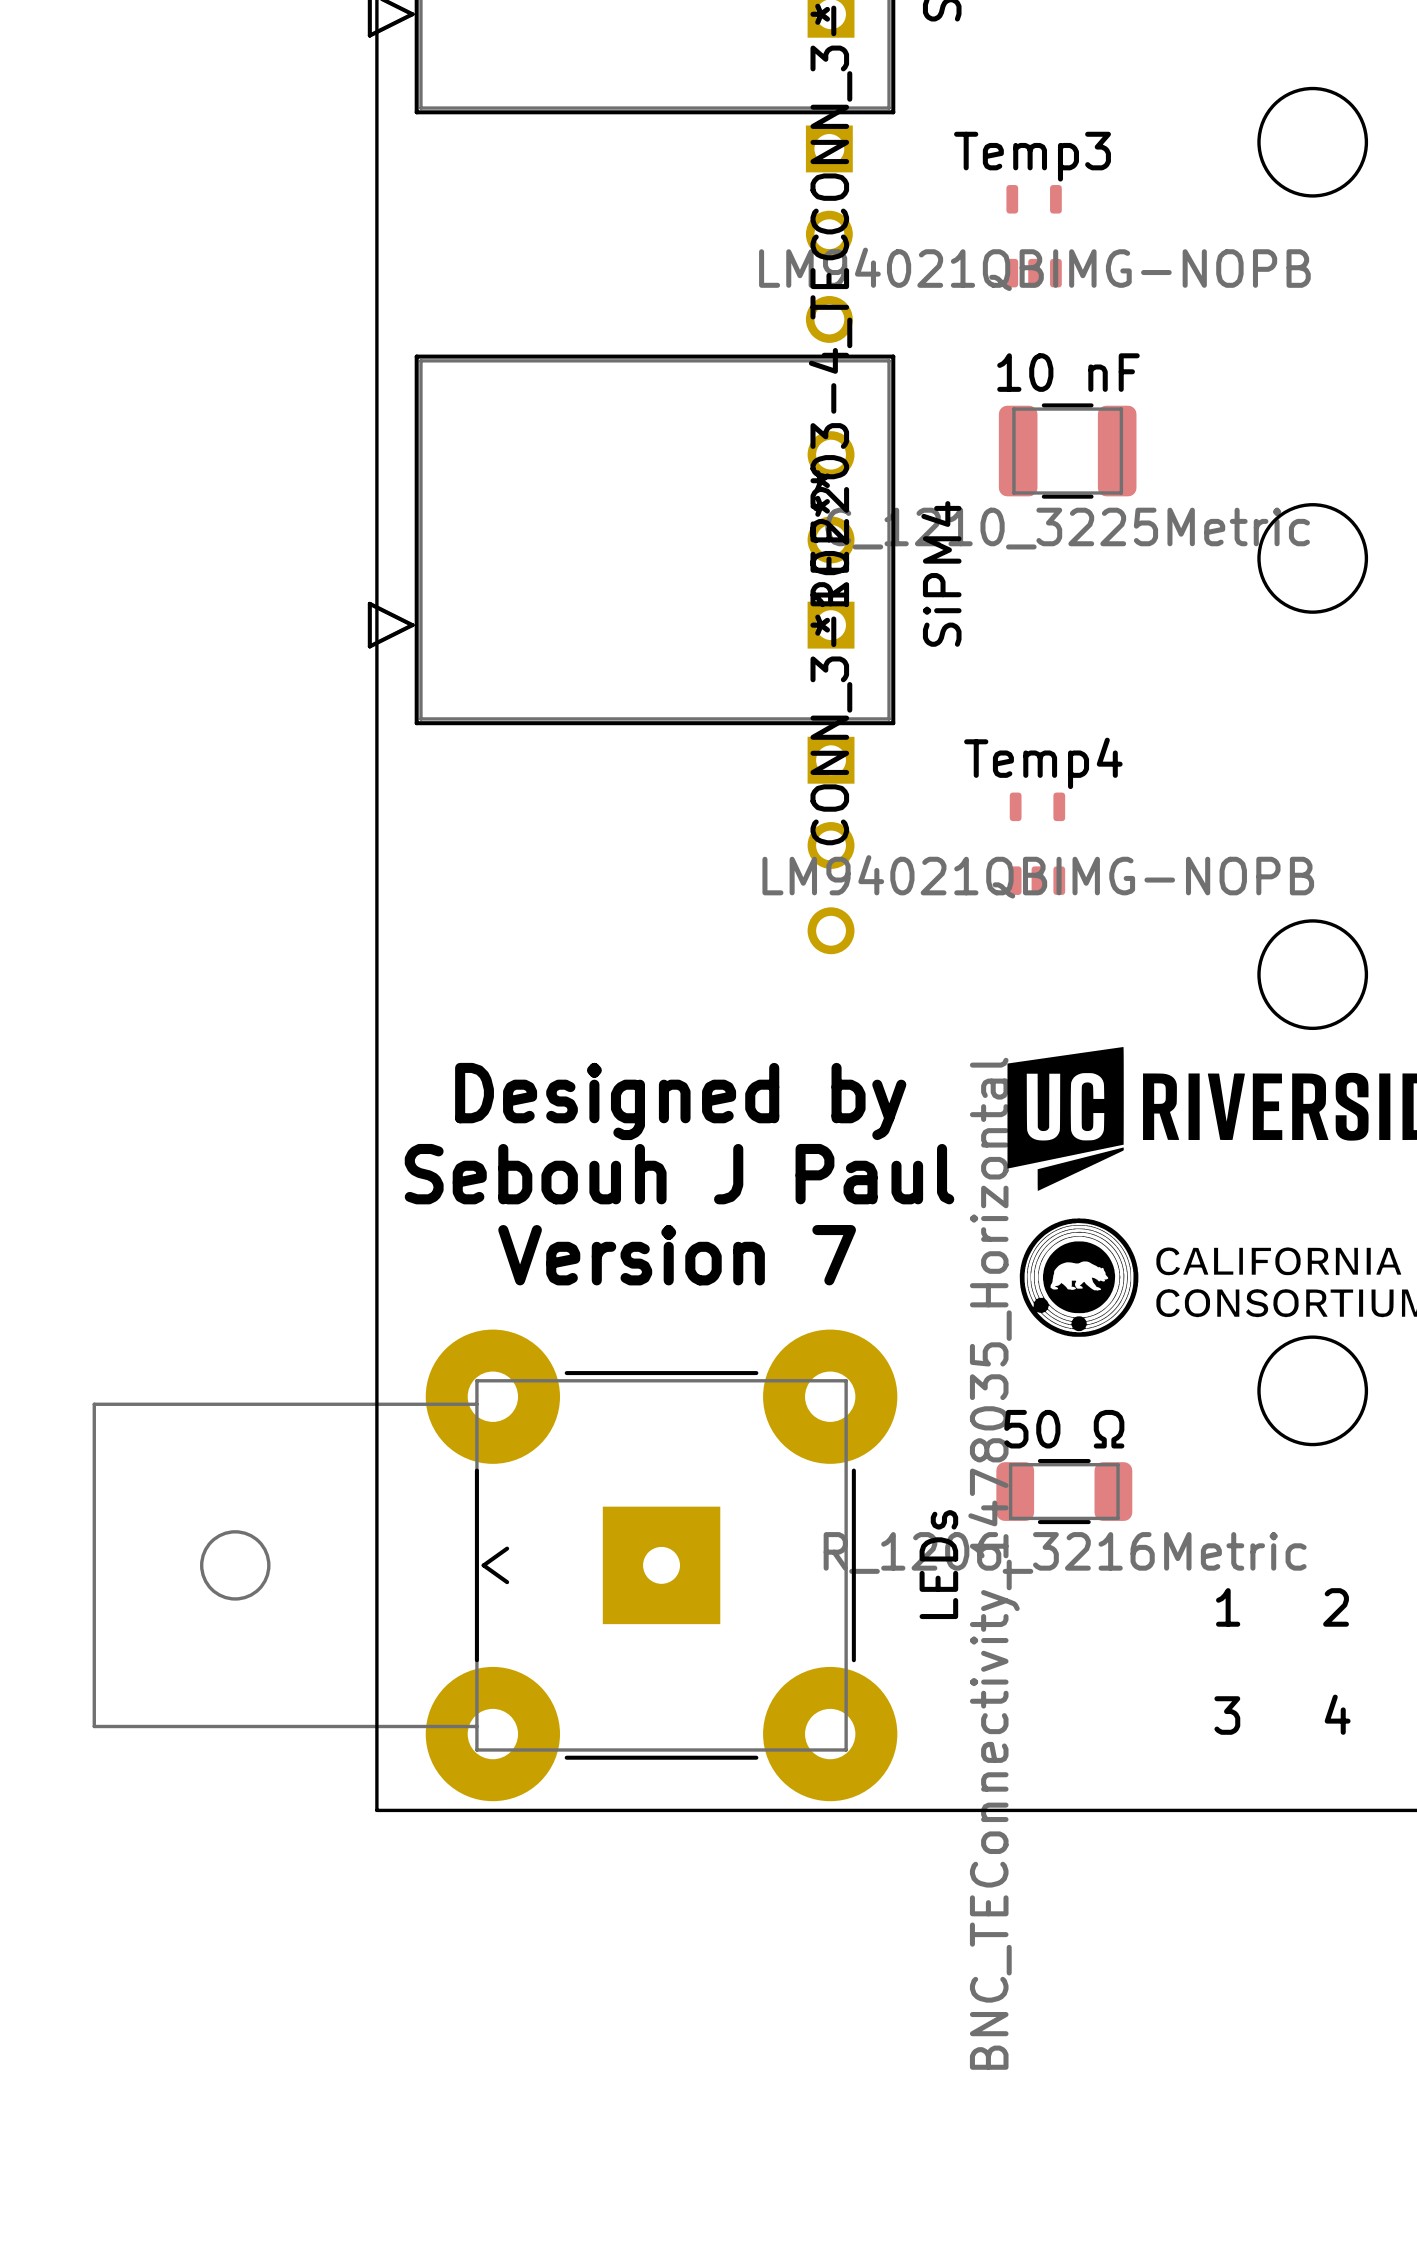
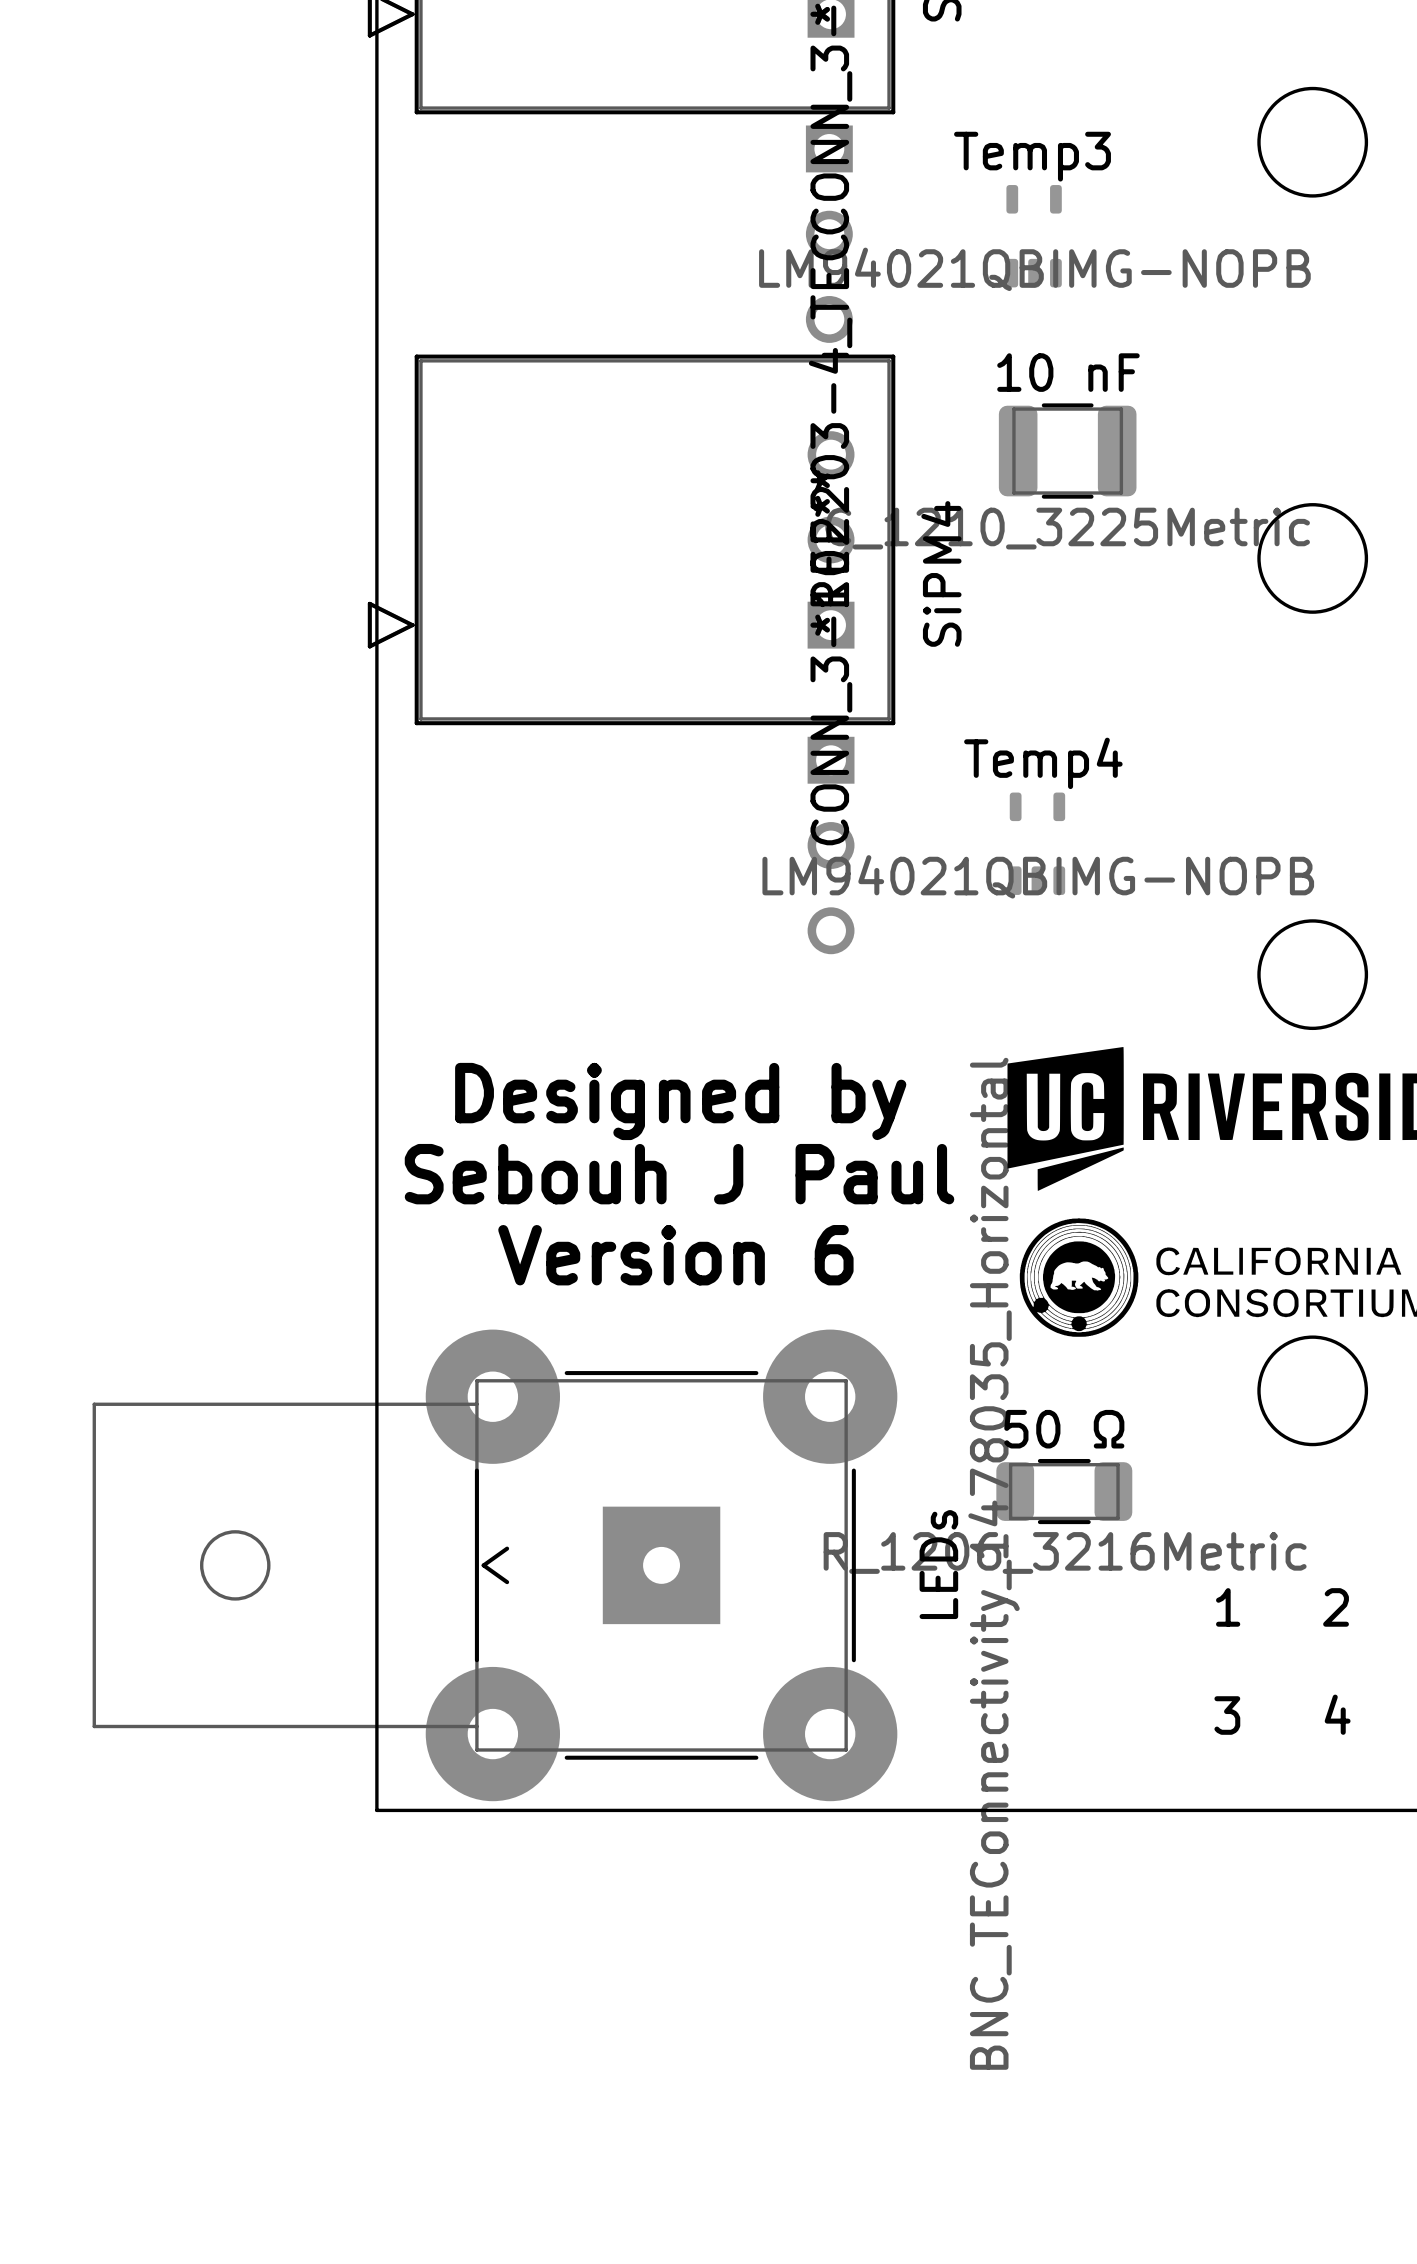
text: Version 7 (677, 1255) -> Version 6 (675, 1255)

